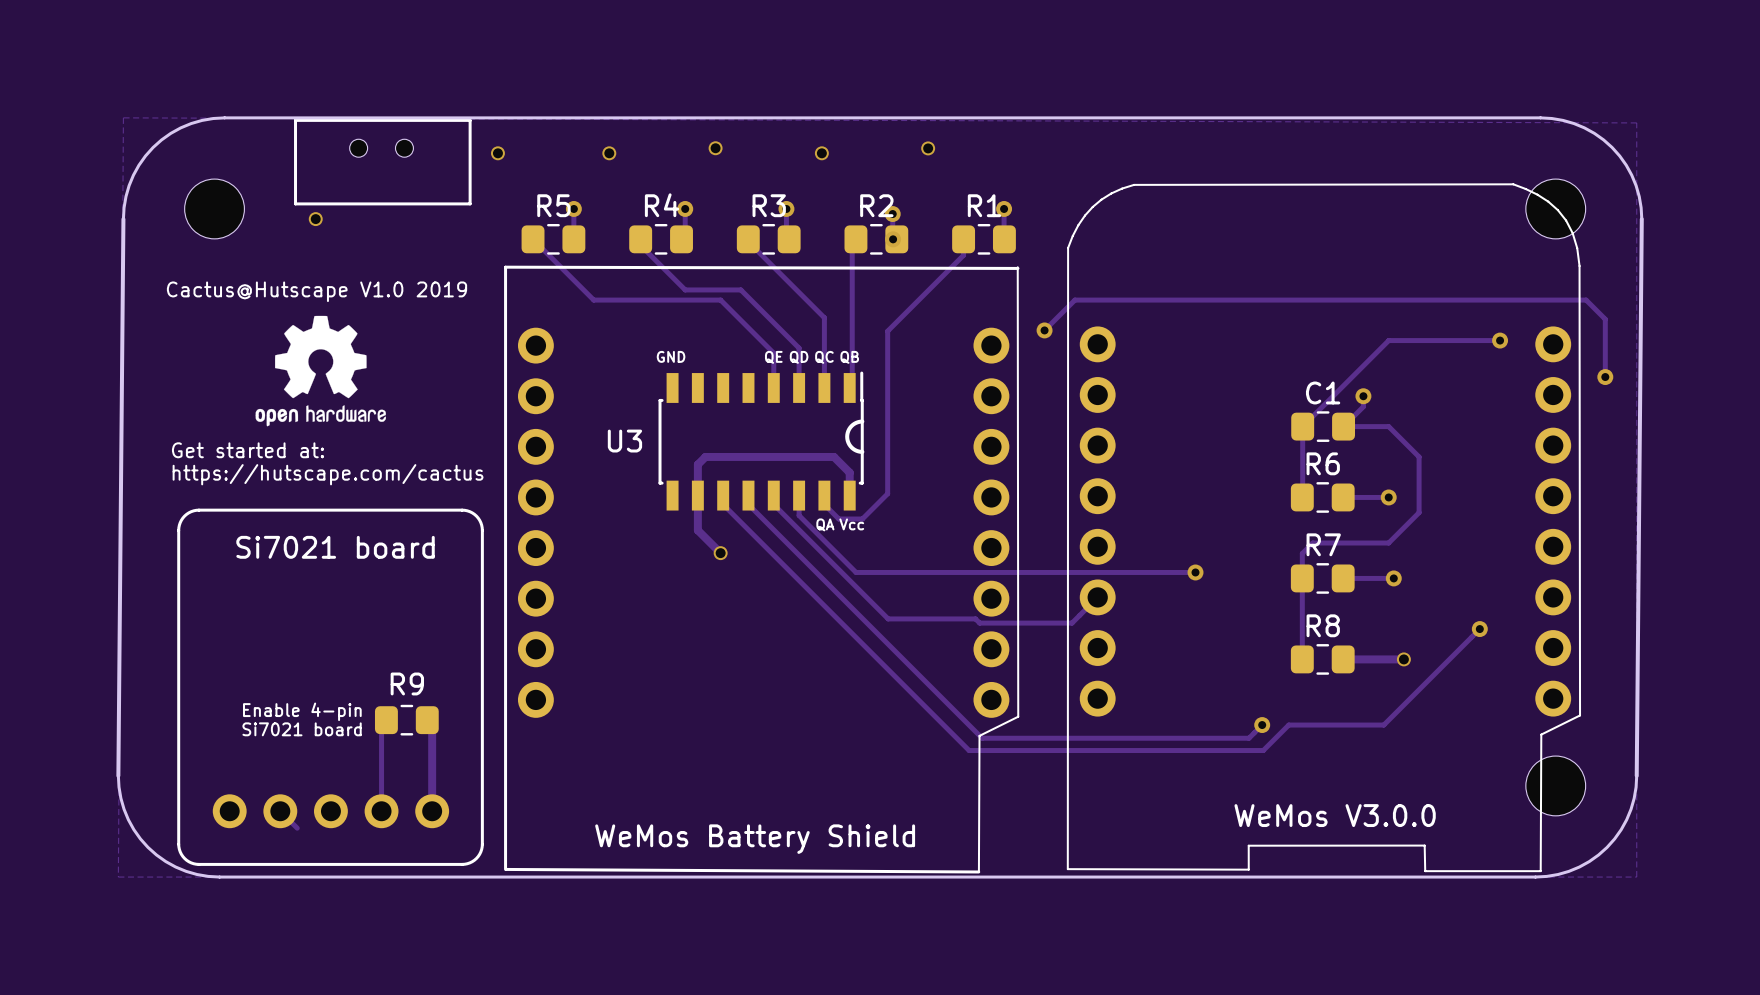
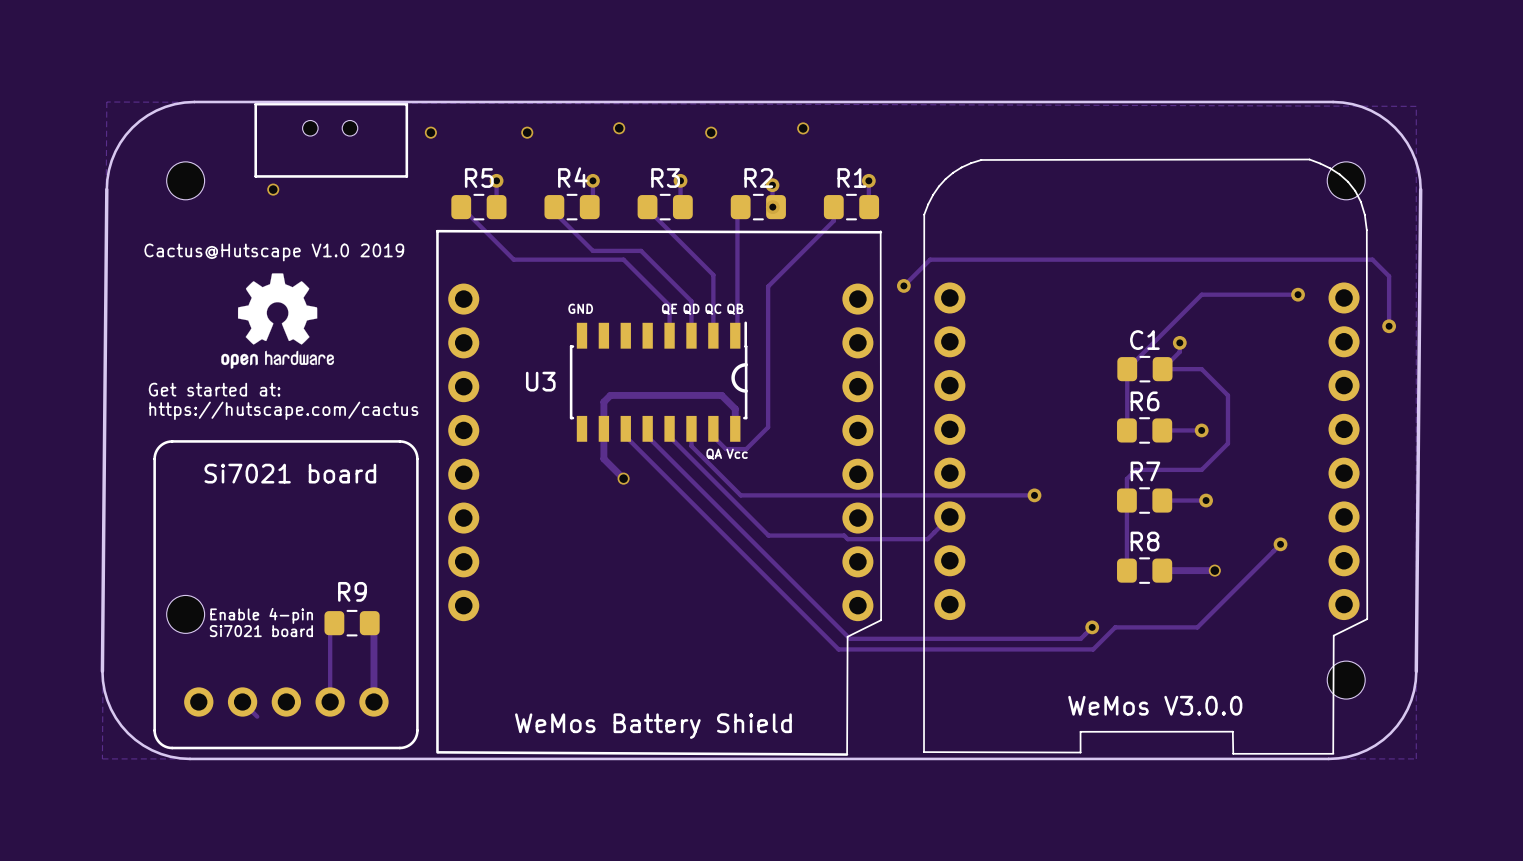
part footprint: [184, 179, 245, 239] -> [166, 161, 205, 200]
part footprint: [1525, 179, 1586, 239] -> [1327, 161, 1366, 200]
part: none -> (185, 614)
part footprint: [1525, 756, 1586, 816] -> [1327, 661, 1366, 700]

